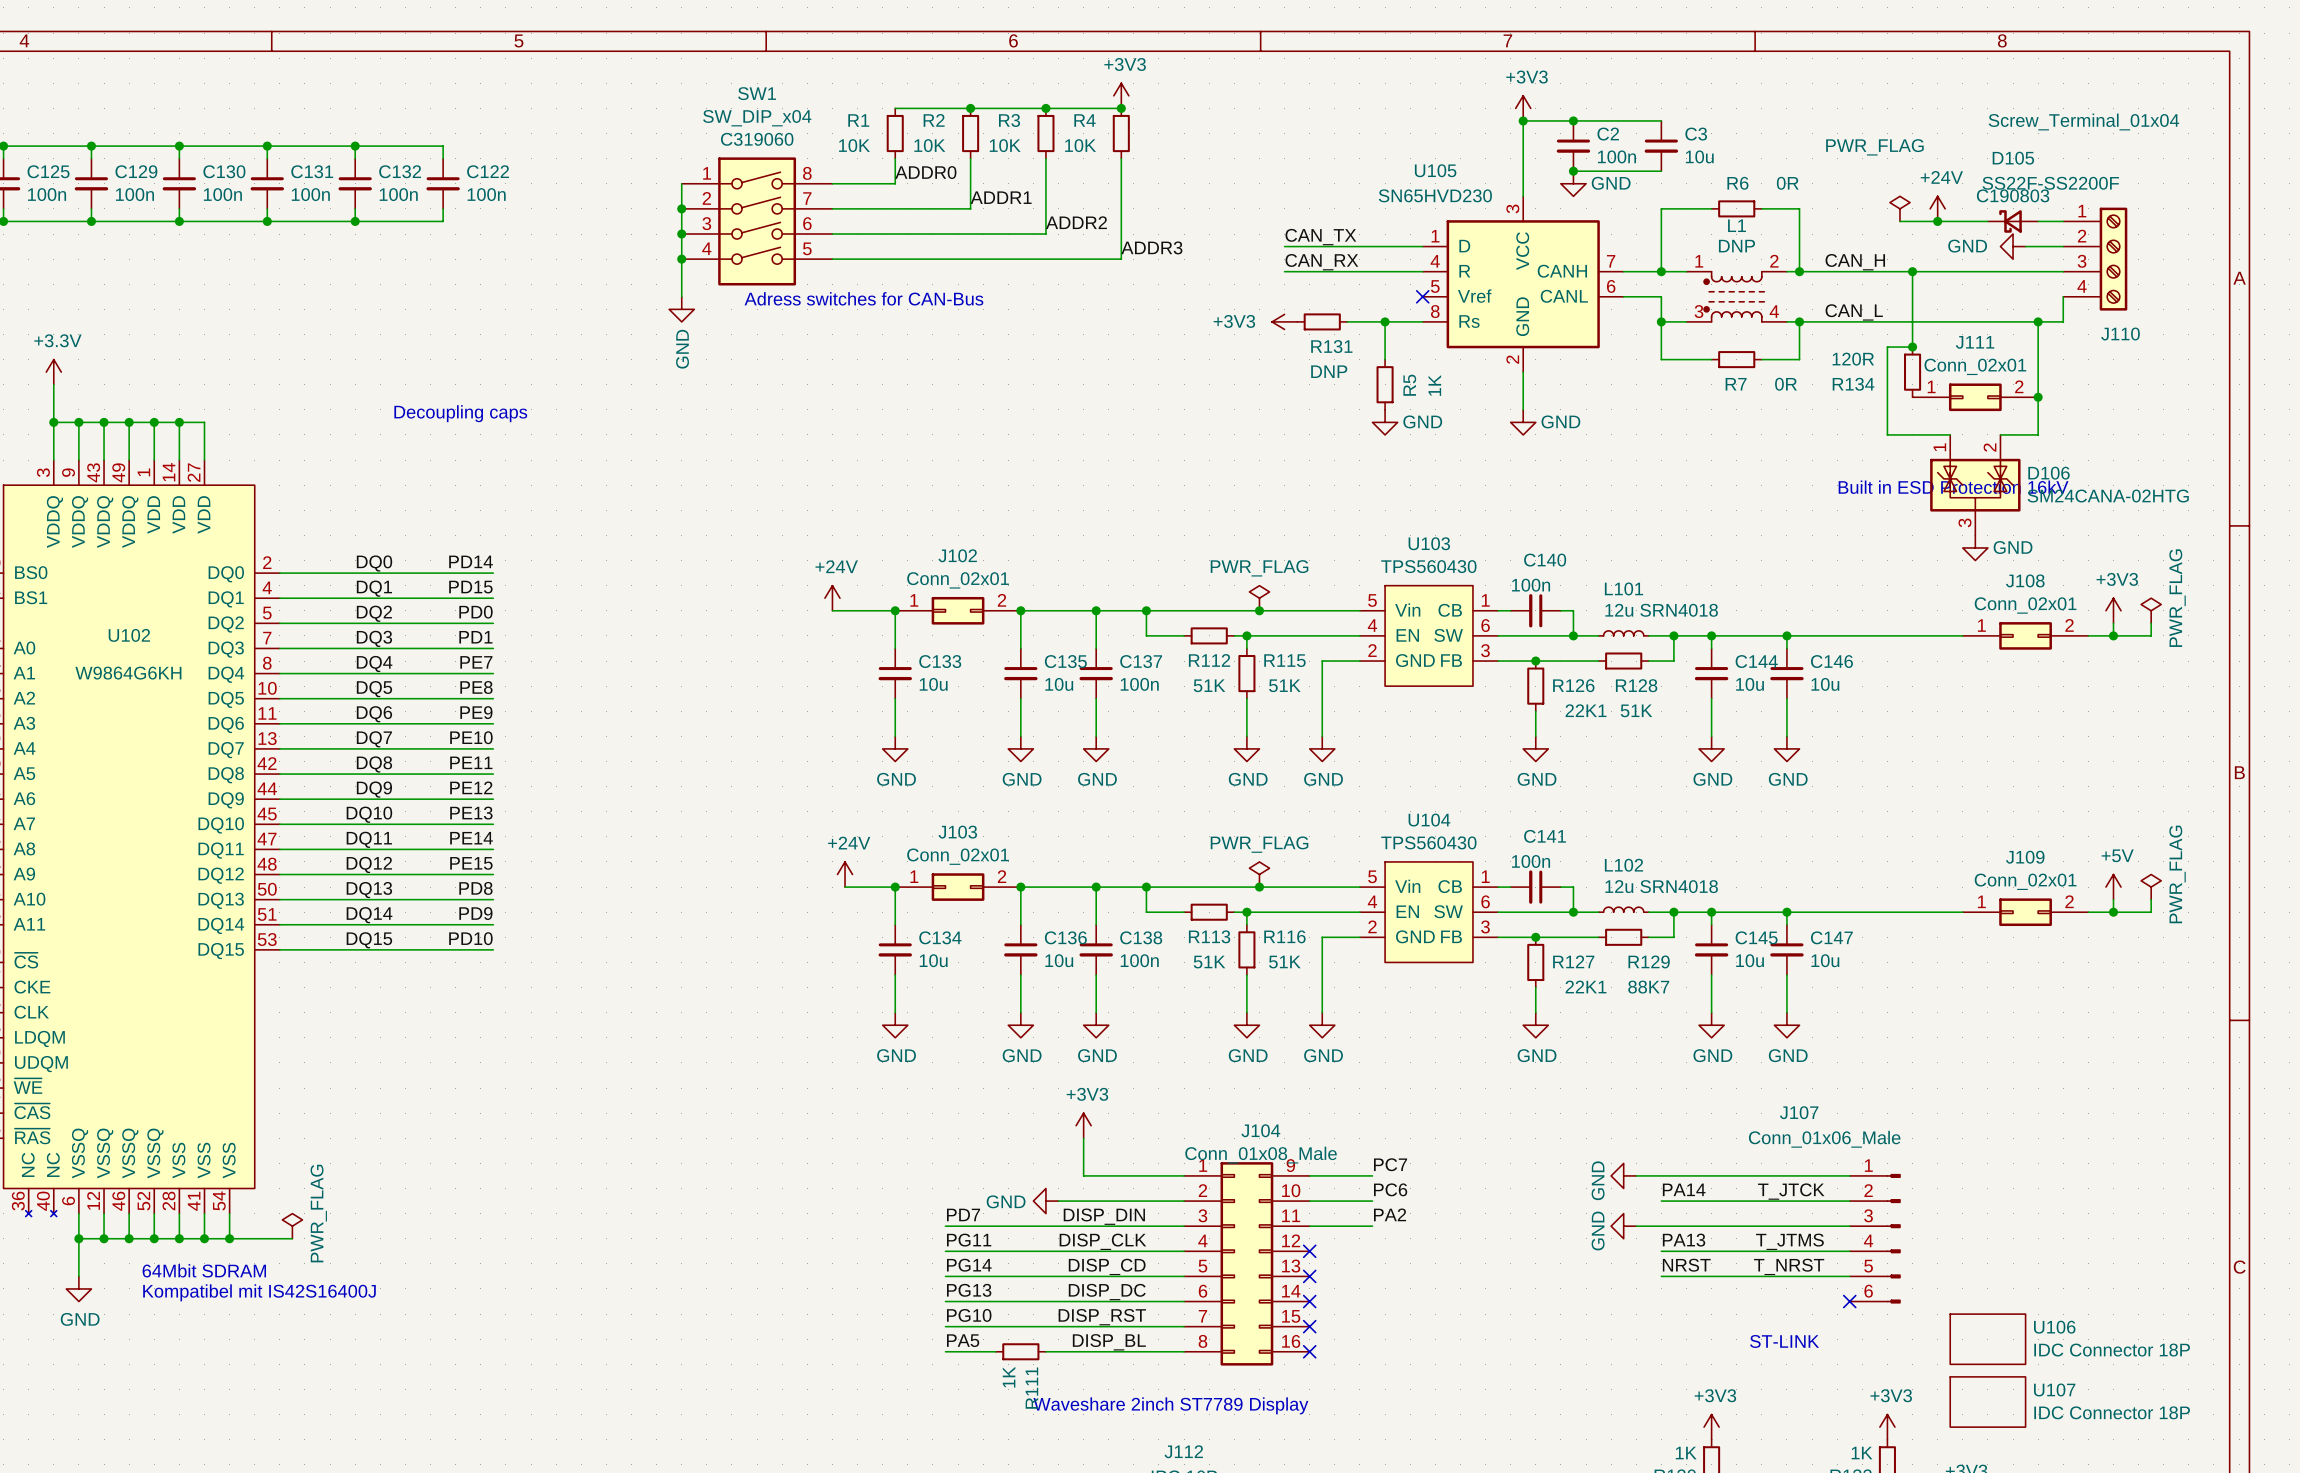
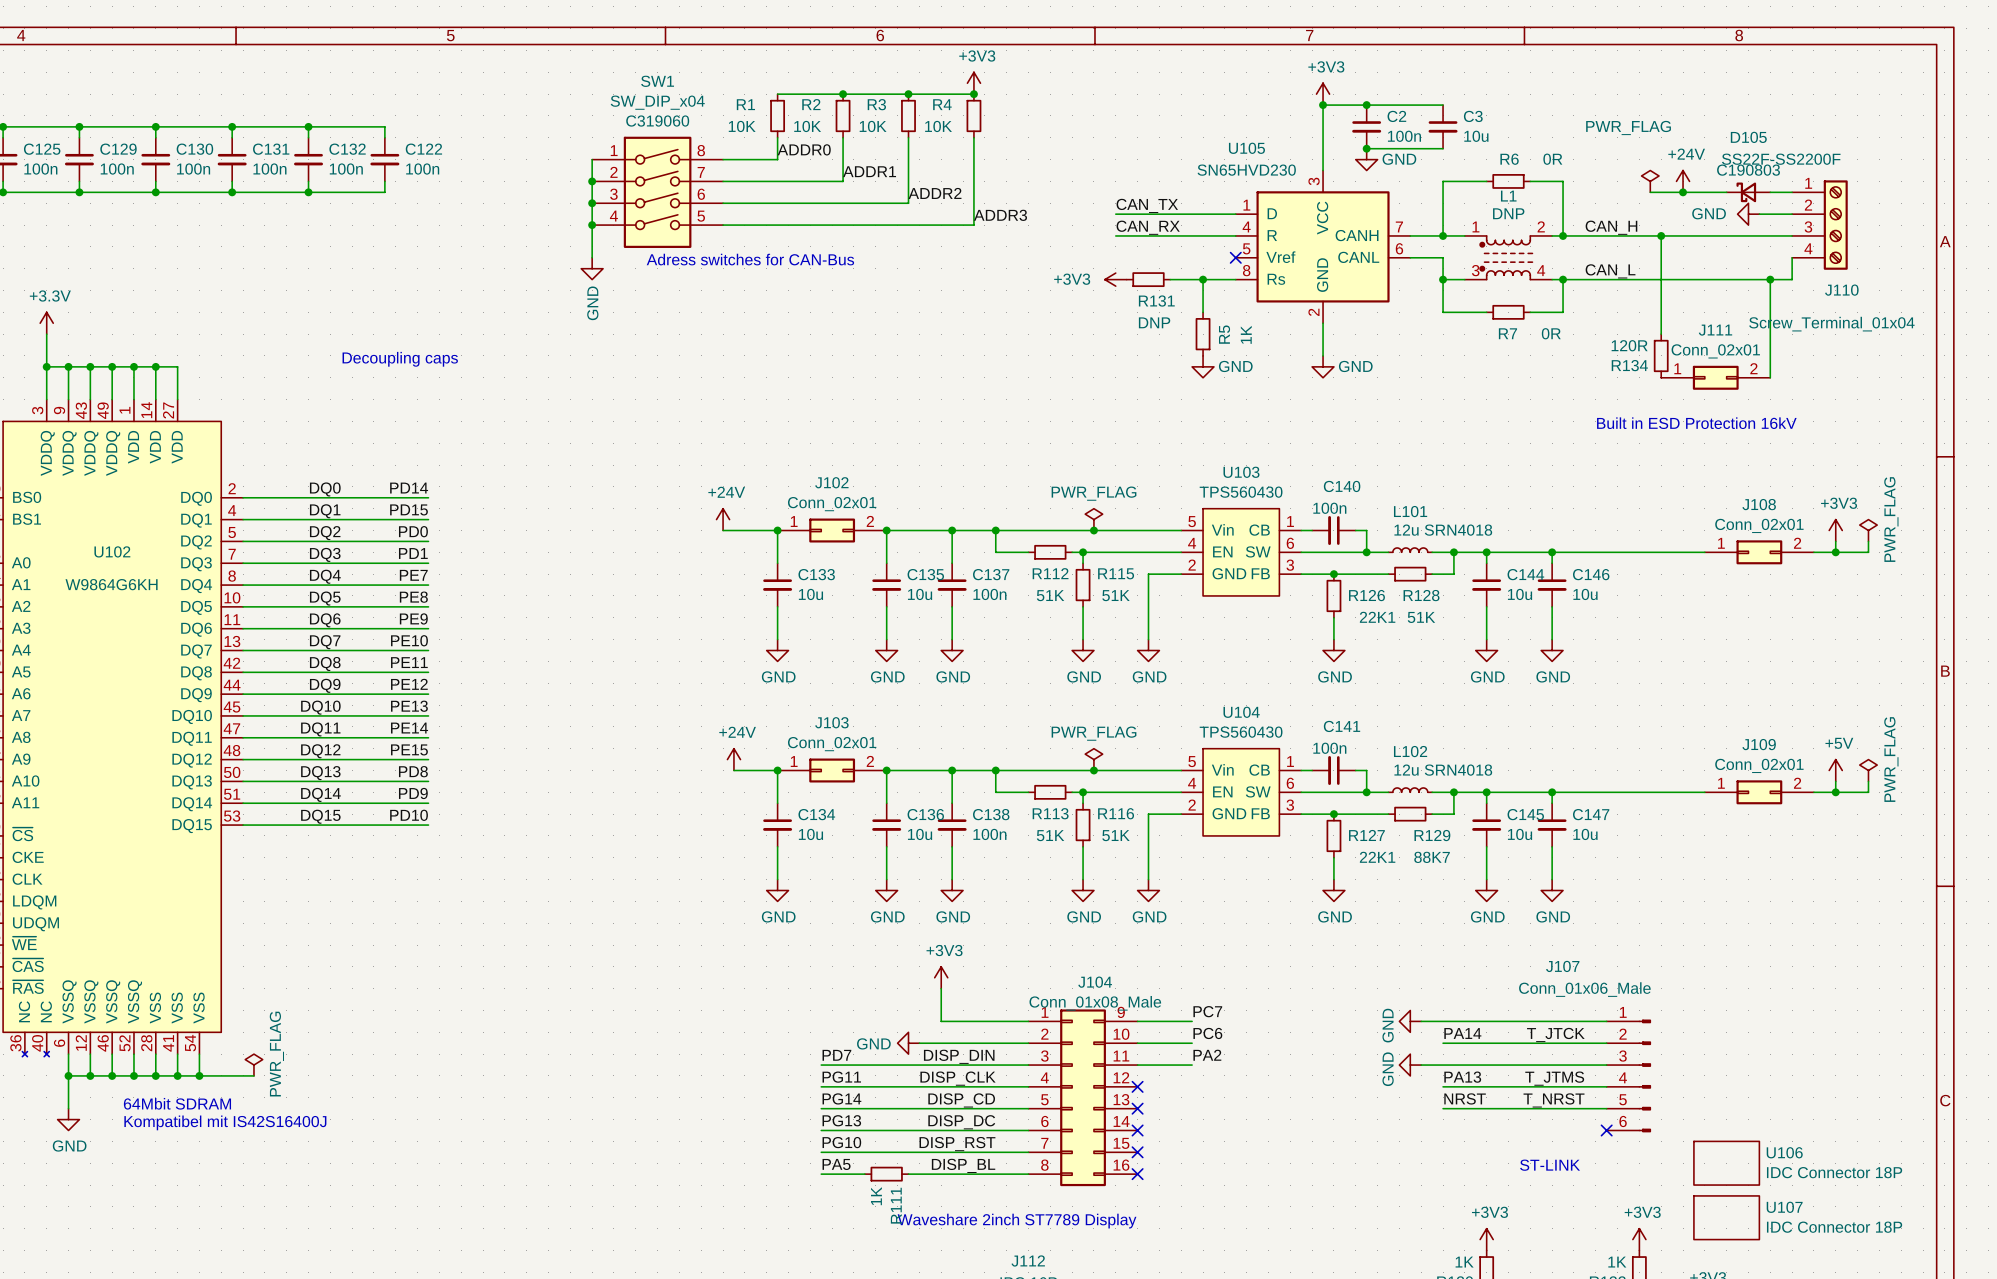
J110 value position: Screw_Terminal_01x04 (2083, 121) -> Screw_Terminal_01x04 (1831, 324)
wire: (1912, 347) (1887, 347) (1887, 434) (1950, 434) -> (1661, 301) (1661, 334)
junction: (1912, 347) -> none
R134 value position: 120R (1853, 359) -> 120R (1629, 345)
R134 position: (1912, 372) -> (1661, 355)
R134 name position: R134 (1853, 384) -> R134 (1629, 365)
J111 position: (1975, 397) -> (1715, 377)
junction: (2038, 397) -> none
D106: SM24CANA-02HTG (1975, 485) -> none
power symbol: GND (1975, 547) -> none

